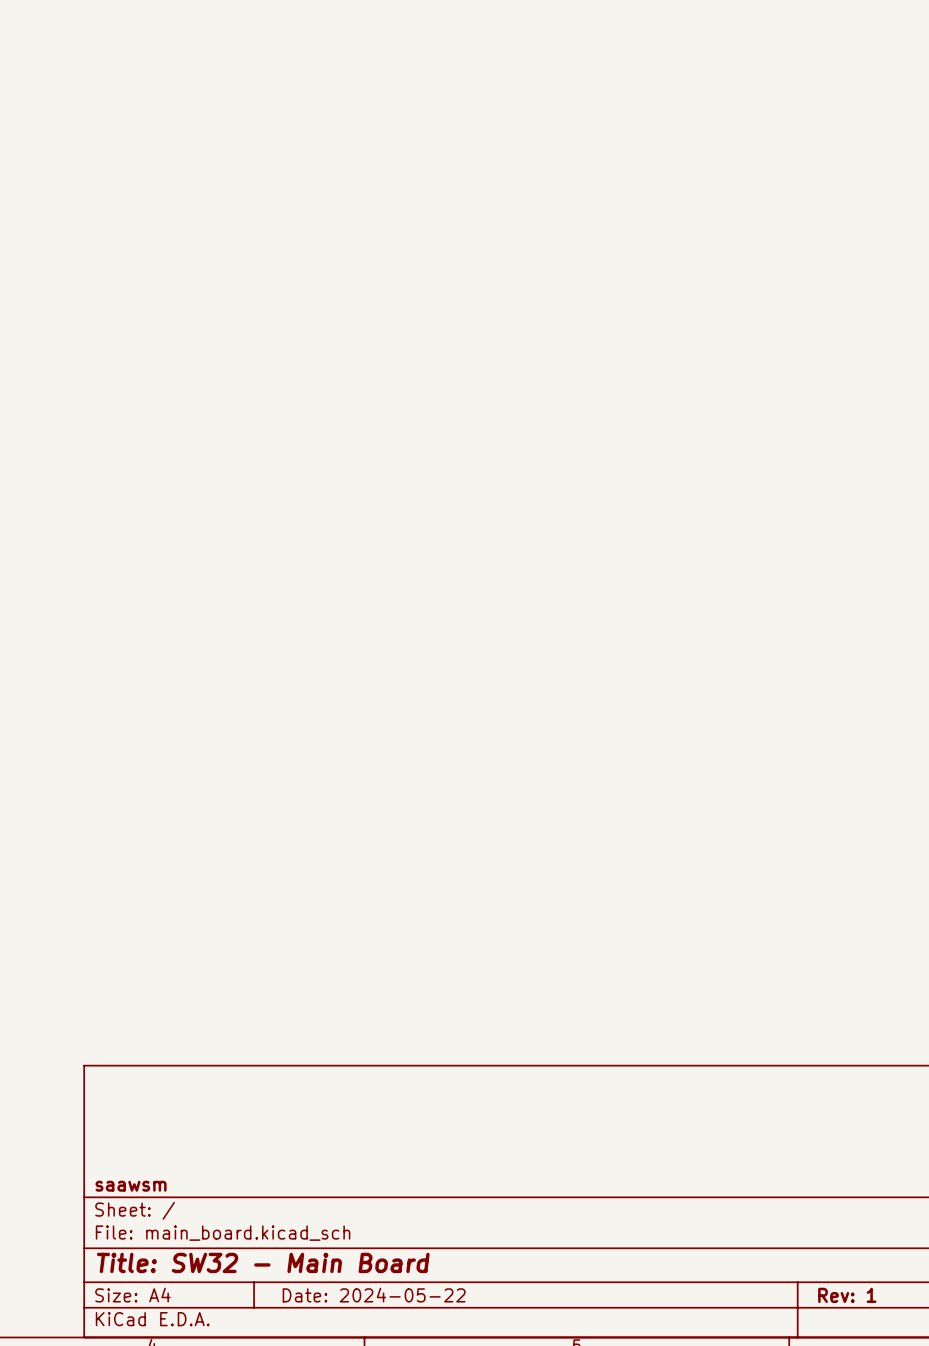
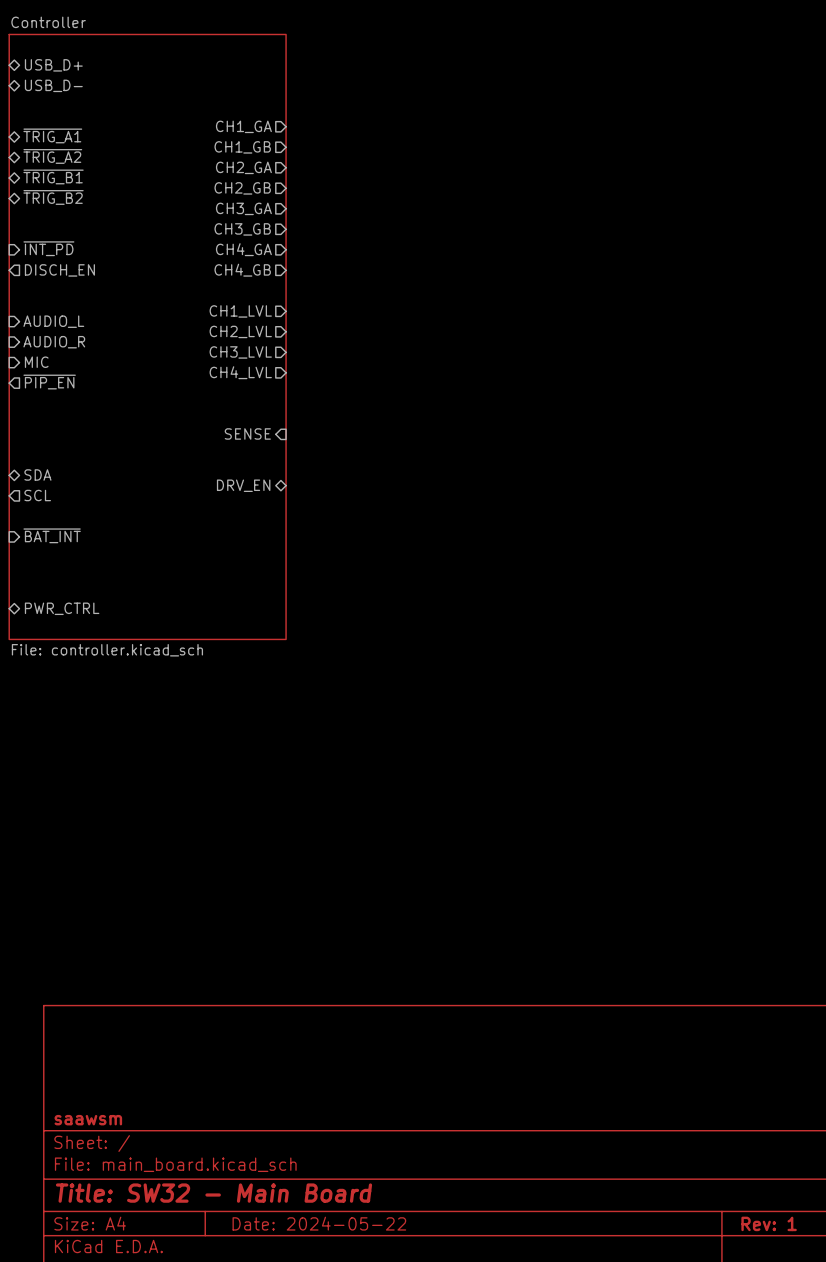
sheet pin: none -> USB_D+ (53, 65)
sheet pin: none -> USB_D- (53, 85)
sheet pin: none -> CH1_GA (243, 126)
sheet pin: none -> ~{TRIG_A1} (52, 135)
sheet pin: none -> CH1_GB (242, 147)
sheet pin: none -> ~{TRIG_A2} (52, 156)
sheet pin: none -> CH2_GA (243, 167)
sheet pin: none -> ~{TRIG_B1} (53, 176)
sheet pin: none -> CH2_GB (242, 188)
sheet pin: none -> ~{TRIG_B2} (53, 197)
sheet pin: none -> CH3_GA (243, 208)
sheet pin: none -> CH3_GB (242, 229)
sheet pin: none -> ~{INT_PD} (48, 248)
sheet pin: none -> CH4_GA (243, 249)
sheet pin: none -> CH4_GB (242, 270)
sheet pin: none -> DISCH_EN (59, 270)
sheet pin: none -> CH1_LVL (240, 311)
sheet pin: none -> AUDIO_L (53, 321)
sheet pin: none -> CH2_LVL (240, 331)
sheet Controller: none -> File: controller.kicad_sch (147, 336)
sheet pin: none -> AUDIO_R (54, 342)
sheet pin: none -> CH3_LVL (240, 352)
sheet pin: none -> MIC (36, 362)
sheet pin: none -> CH4_LVL (240, 372)
sheet pin: none -> ~{PIP_EN} (49, 382)
sheet pin: none -> SENSE (247, 433)
sheet pin: none -> SDA (37, 475)
sheet pin: none -> DRV_EN (243, 485)
sheet pin: none -> SCL (37, 495)
sheet pin: none -> ~{BAT_INT} (52, 535)
sheet pin: none -> PWR_CTRL (62, 608)

